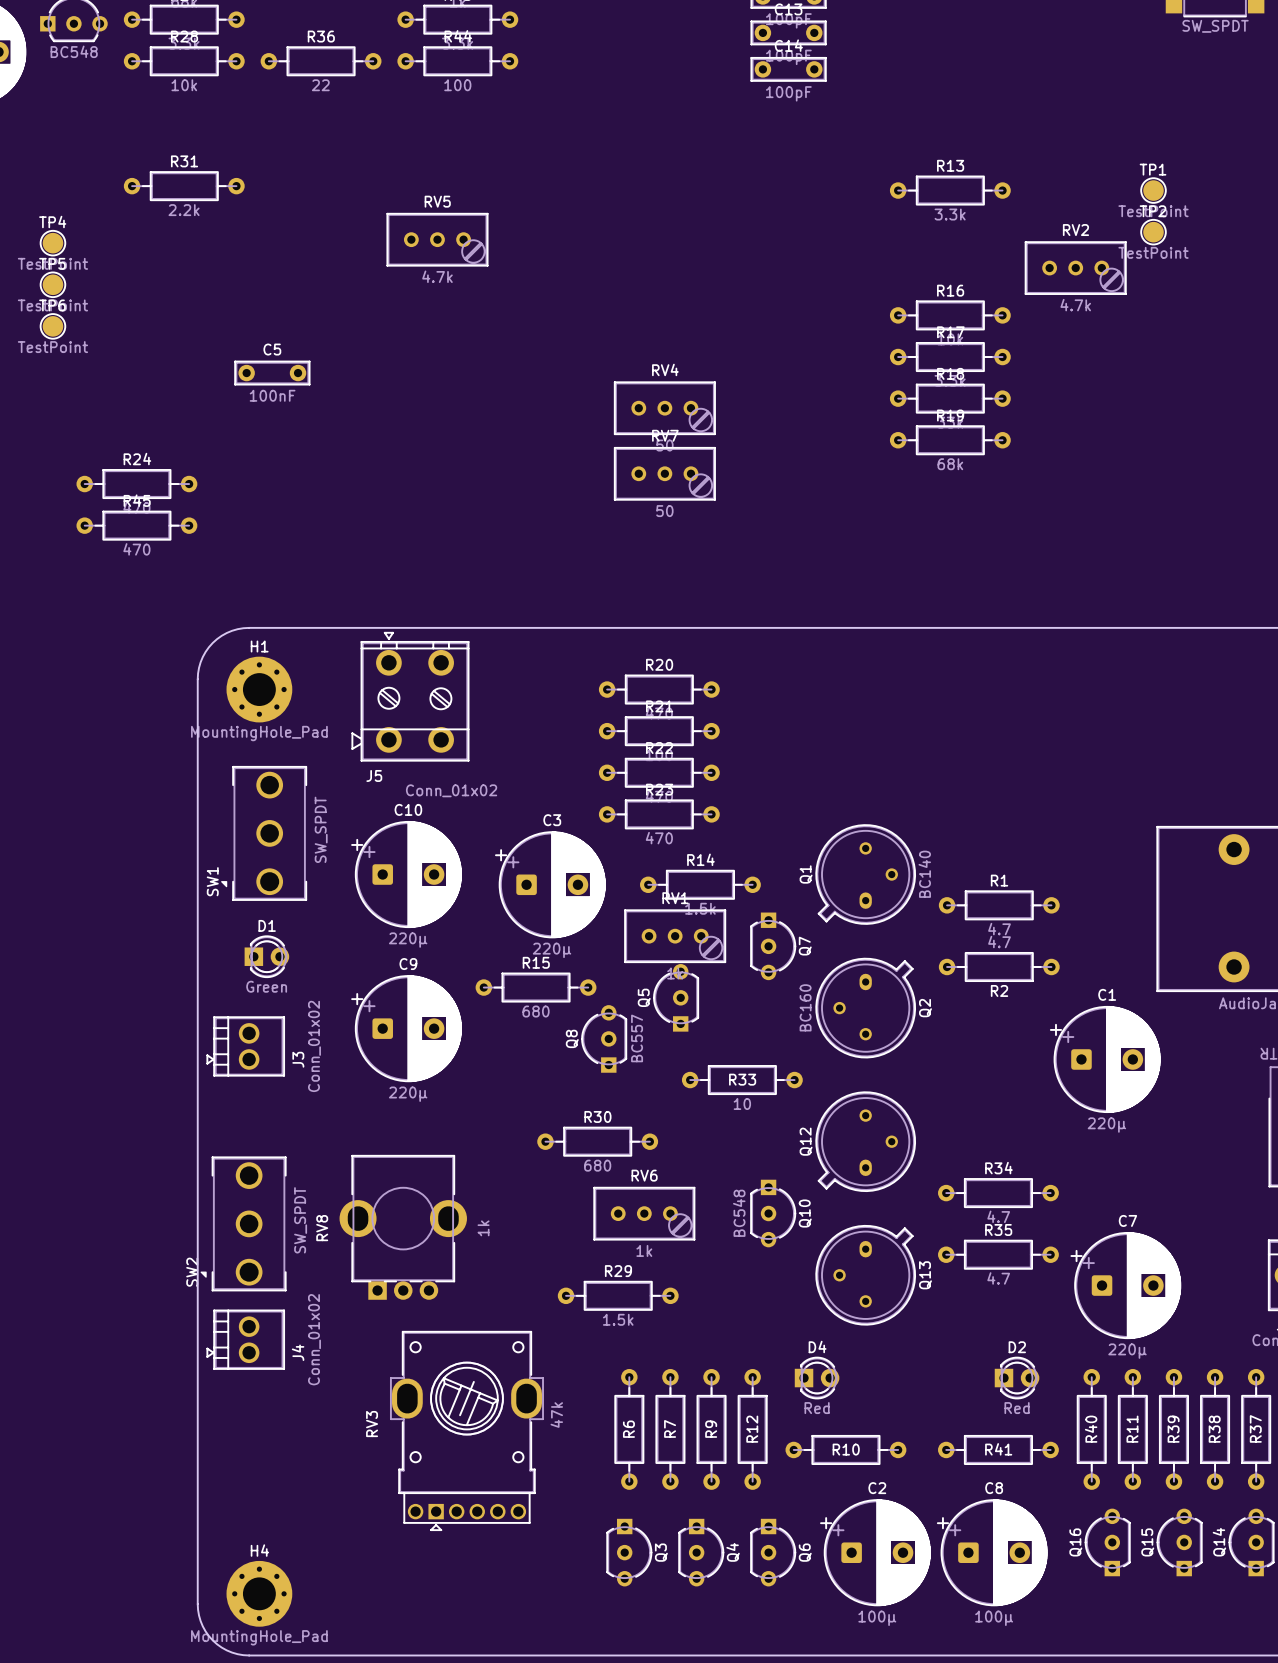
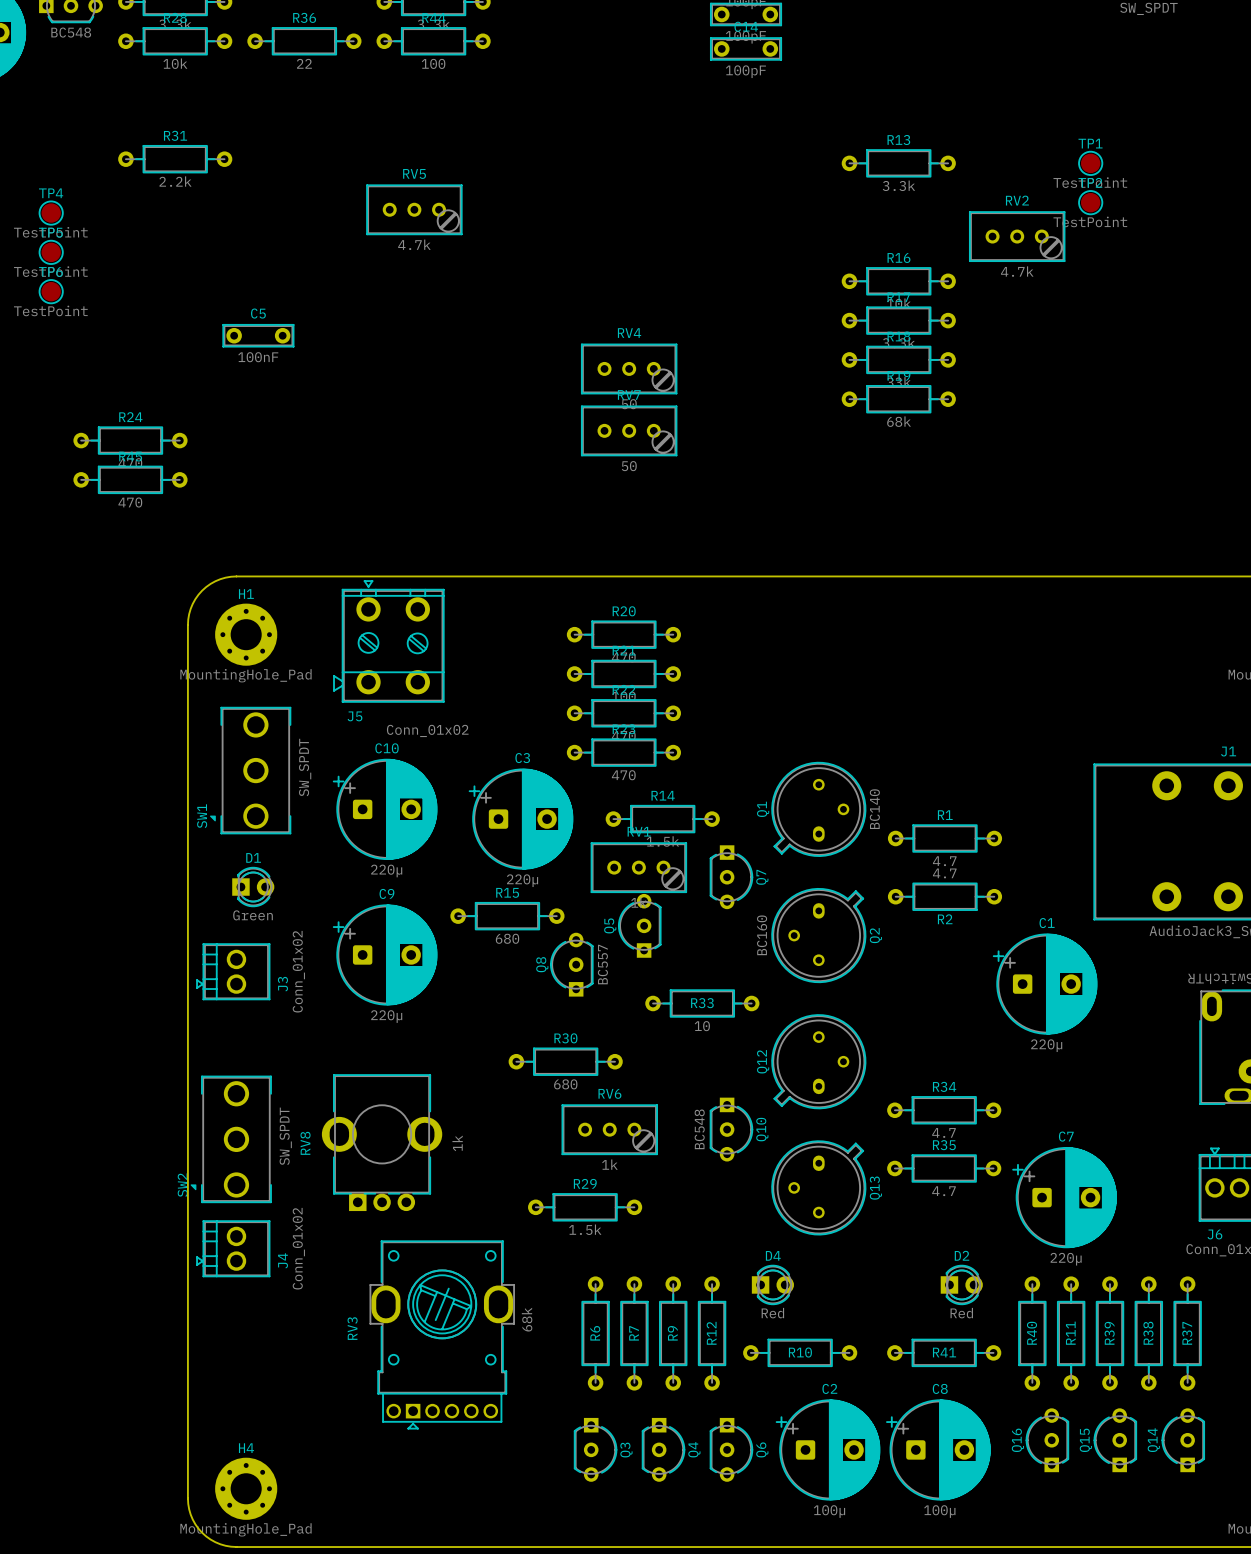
RV3 value: 47k (556, 1415) -> 68k (527, 1319)

